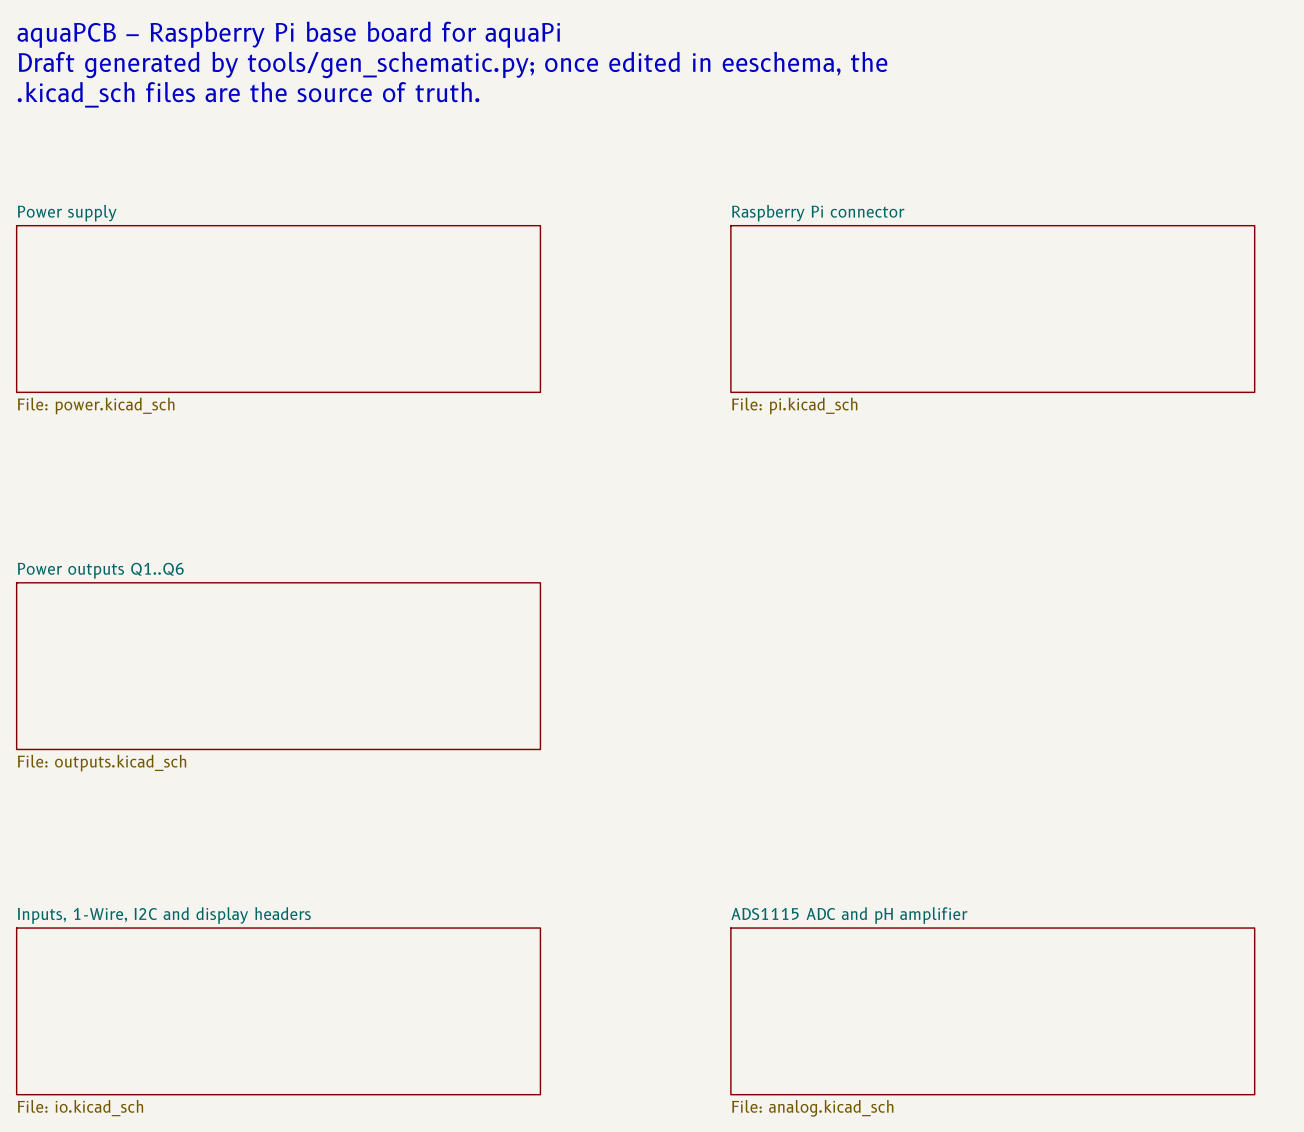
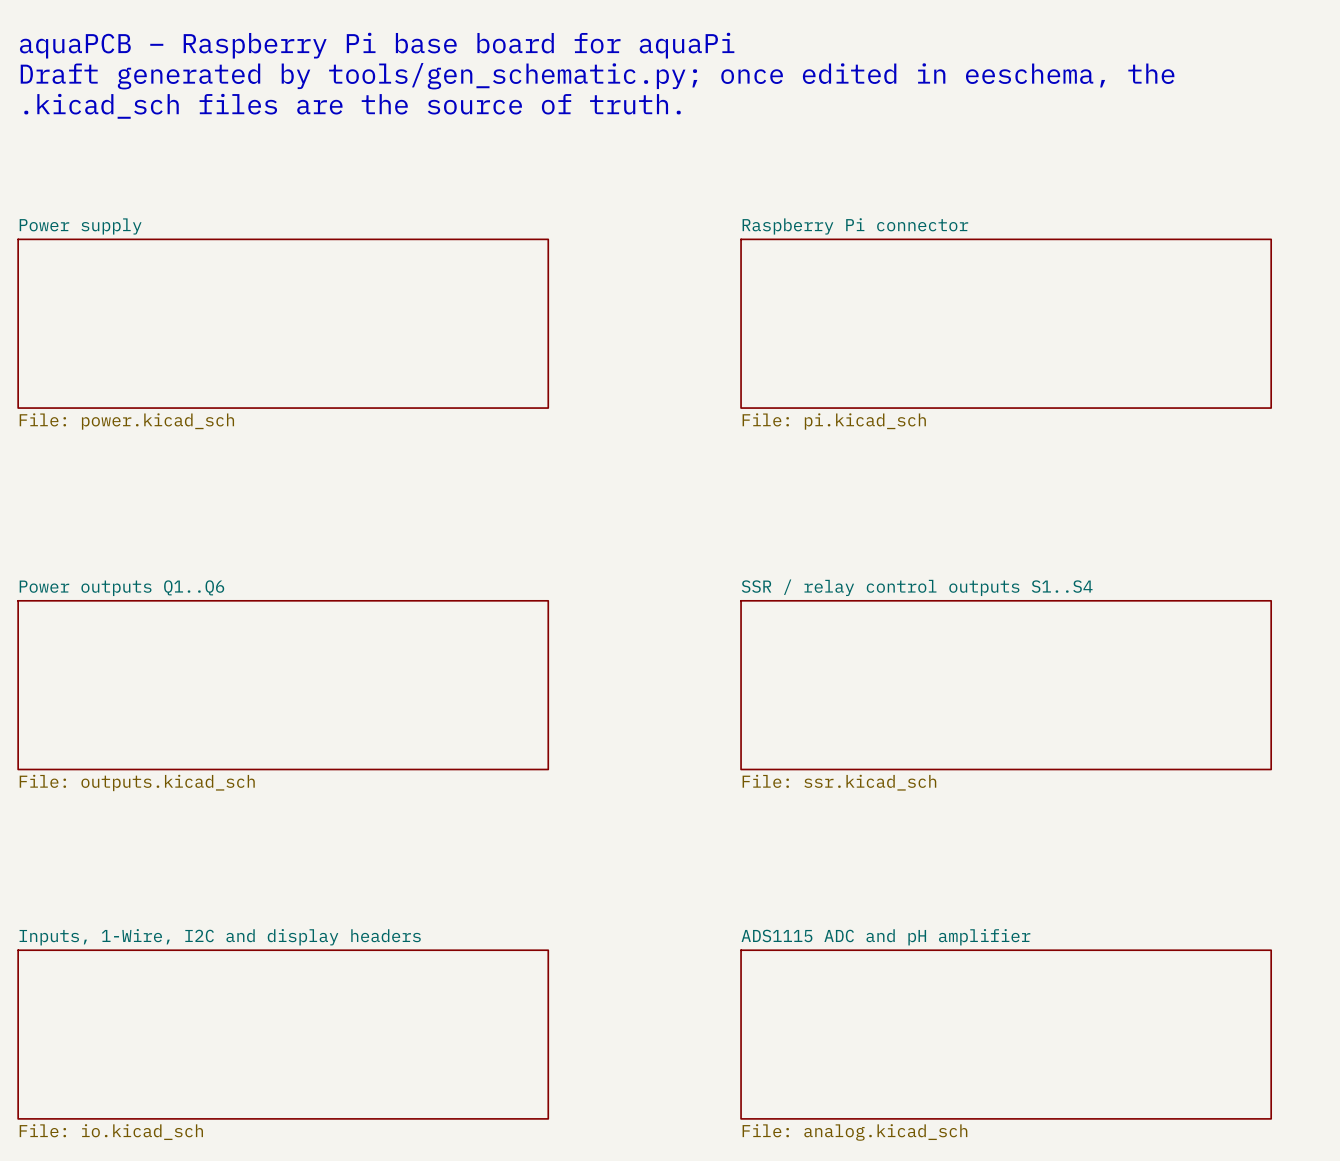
sheet SSR / relay control outputs S1..S4: none -> File: ssr.kicad_sch (1006, 685)

